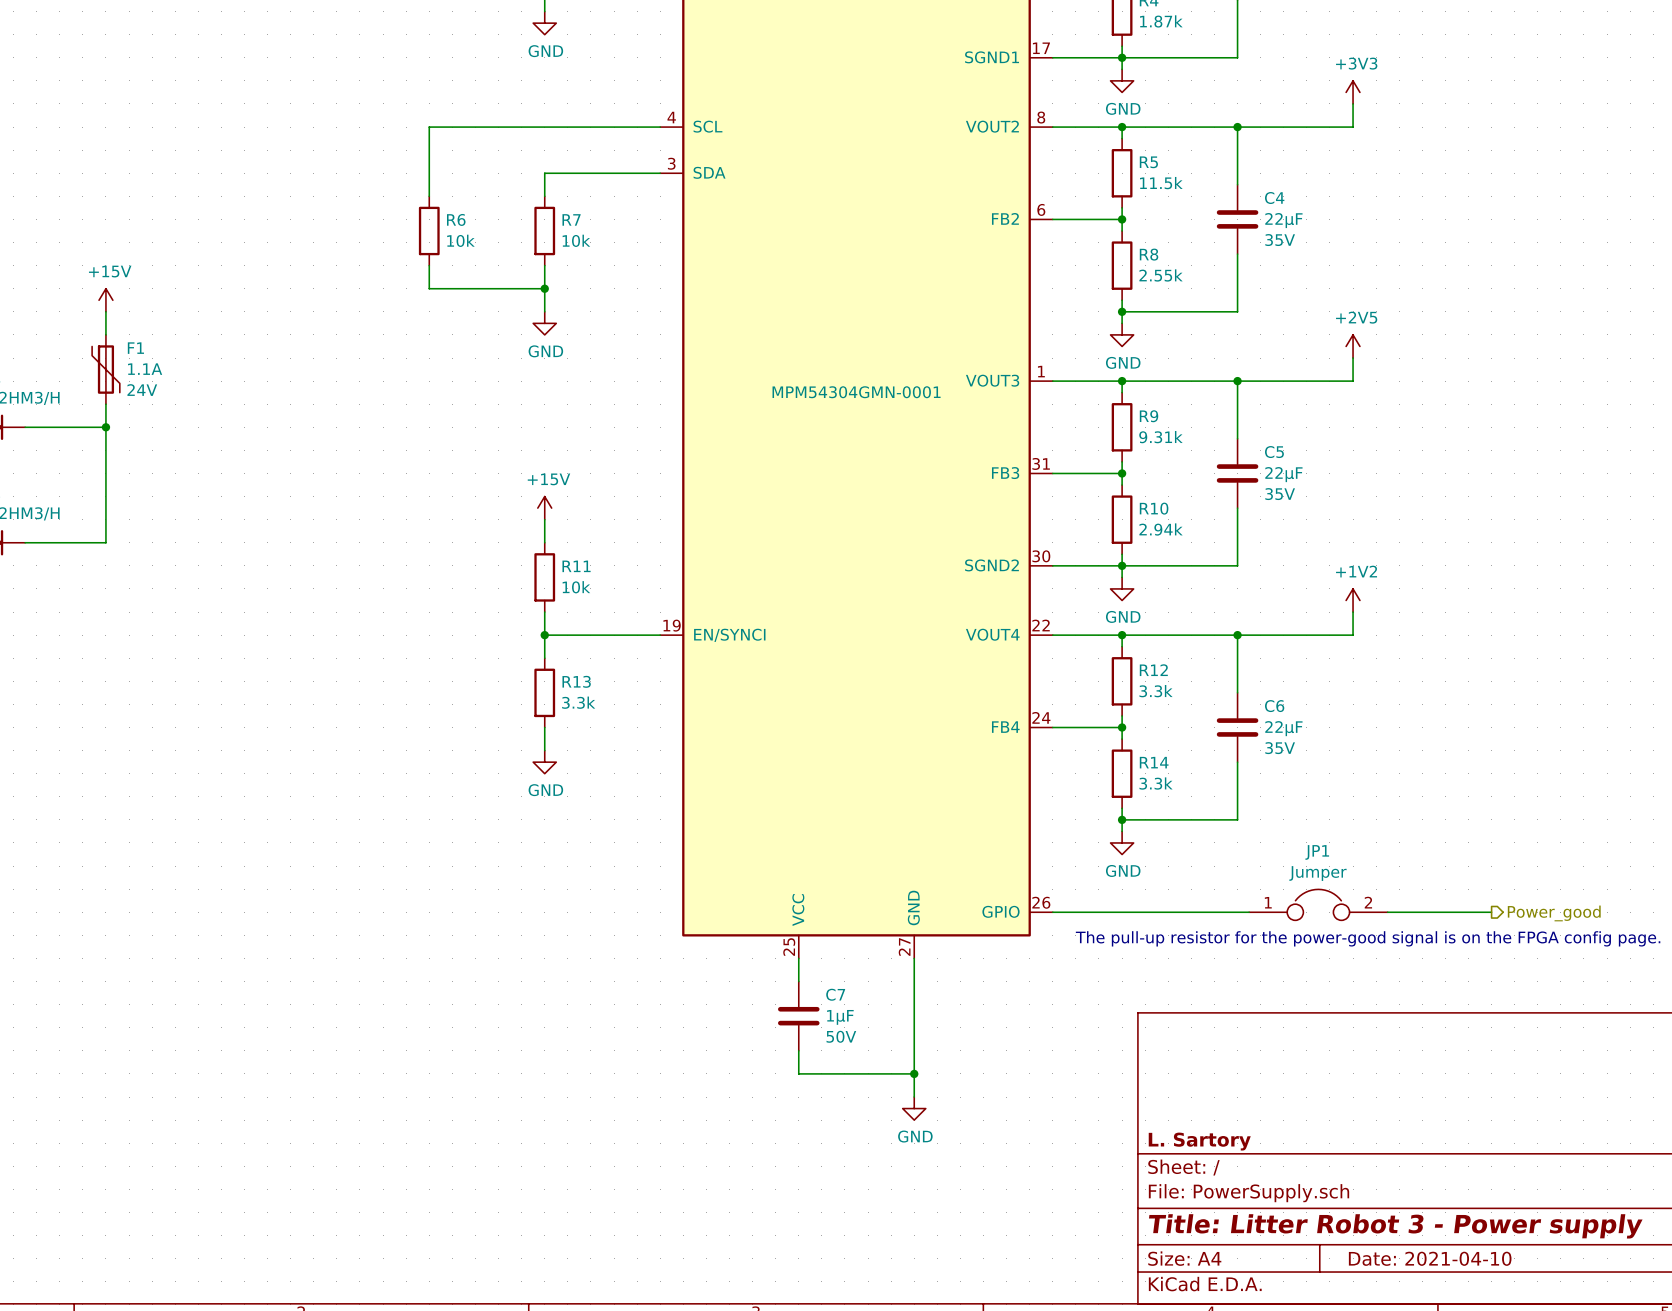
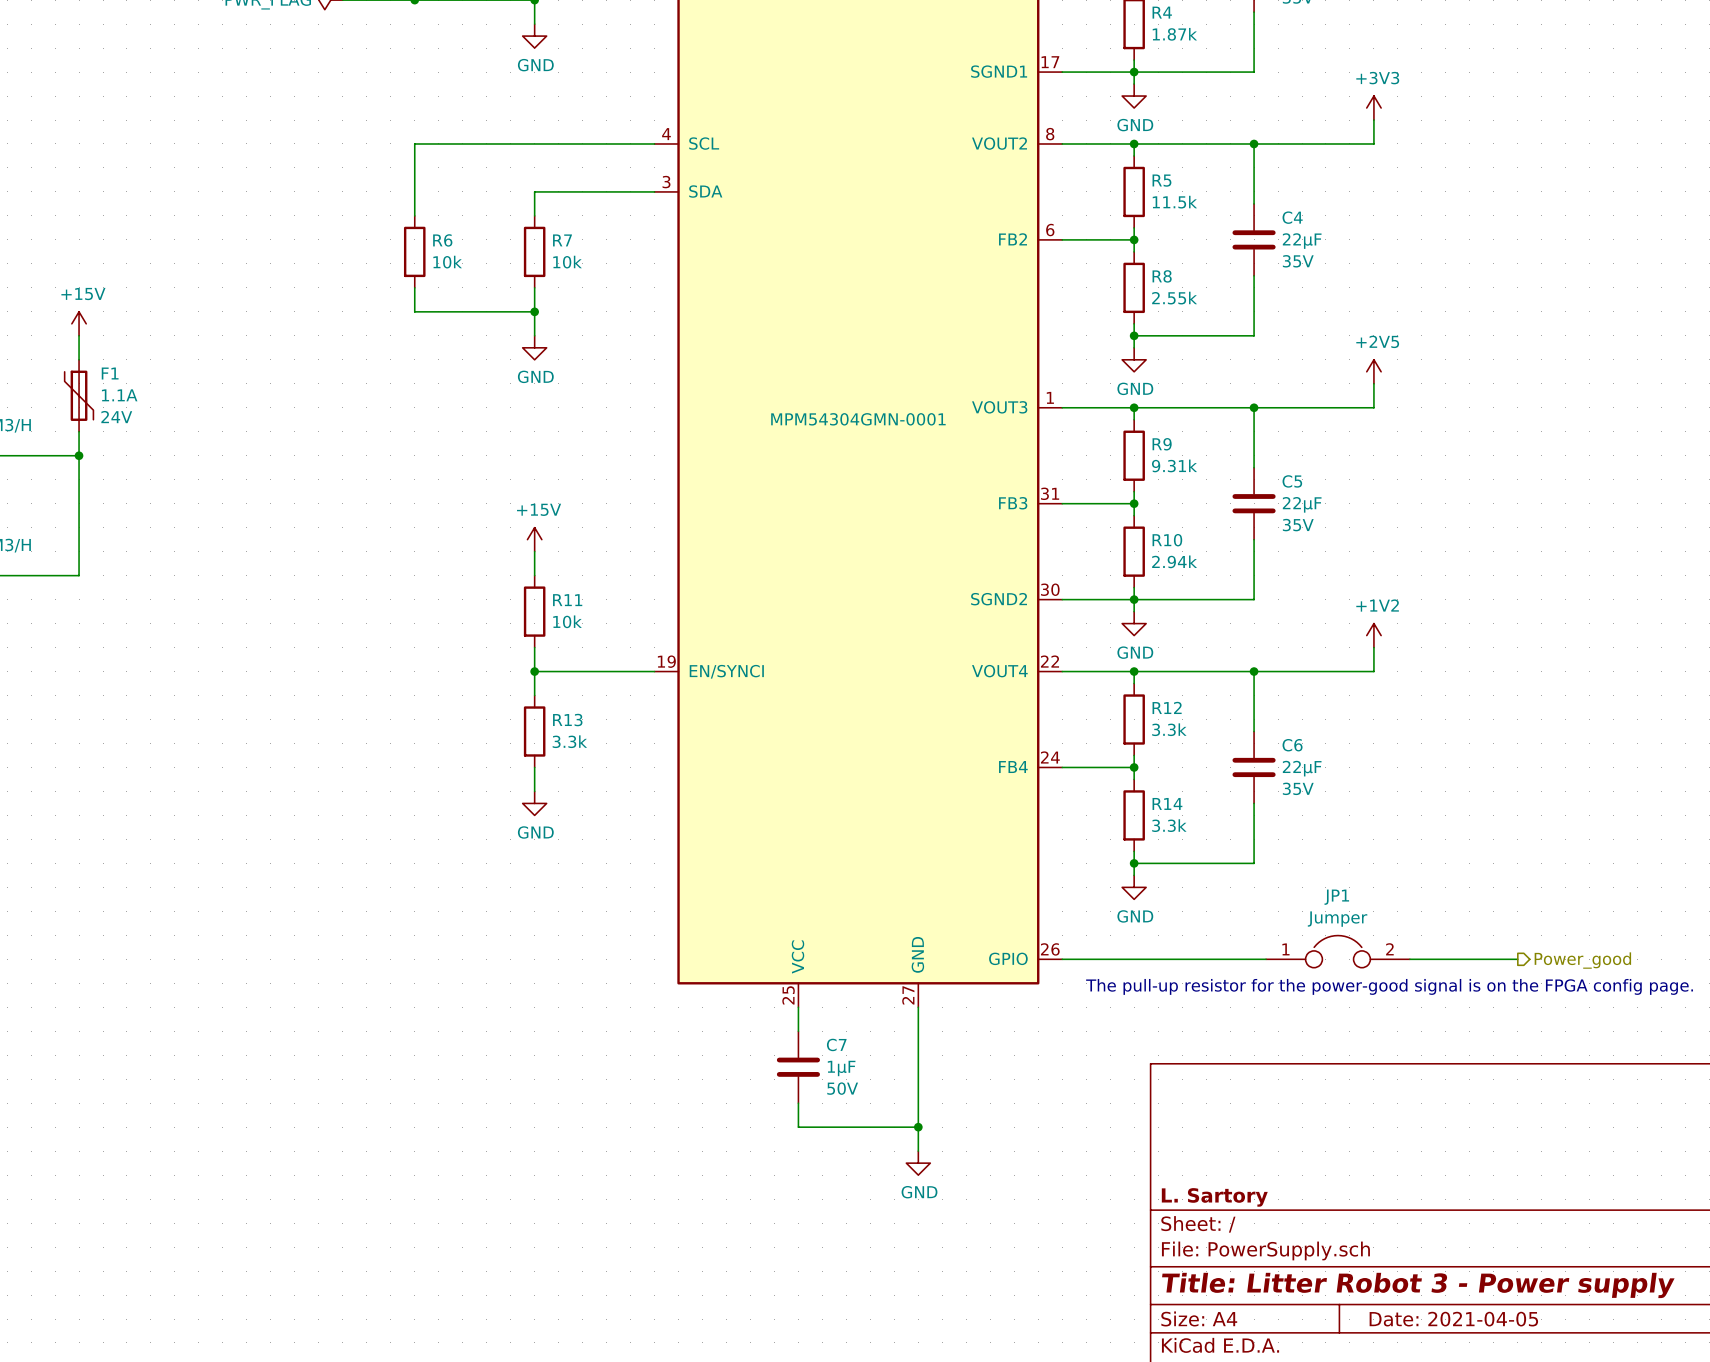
title block: Date: 2021-04-10 (1430, 1258) -> Date: 2021-04-05 (1453, 1319)

